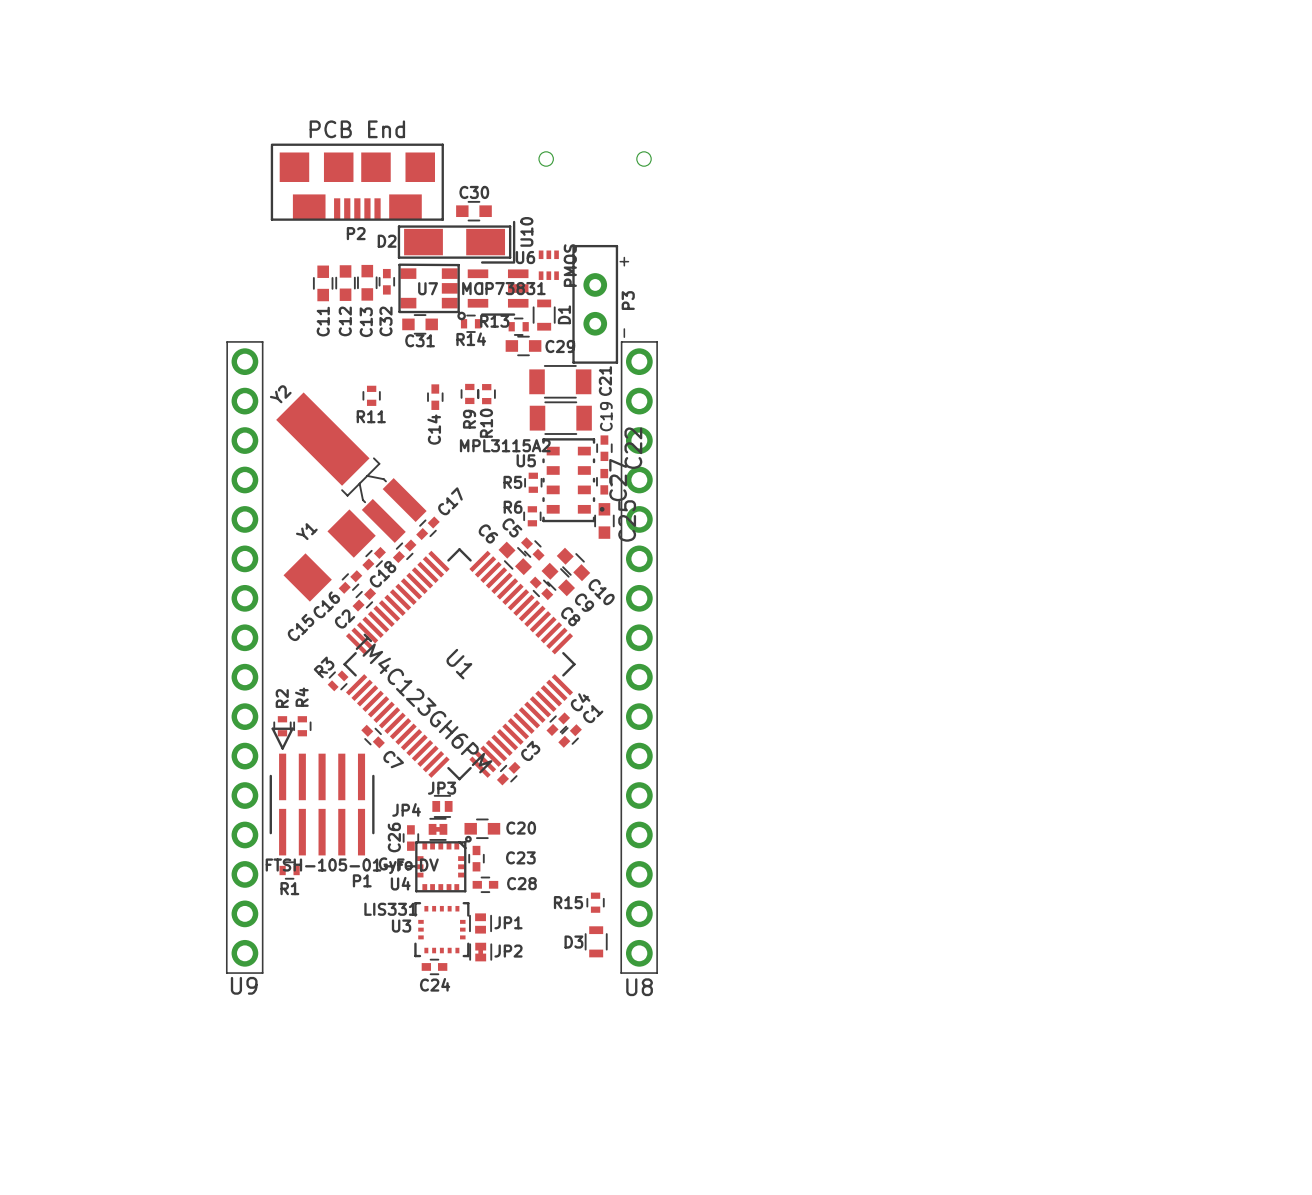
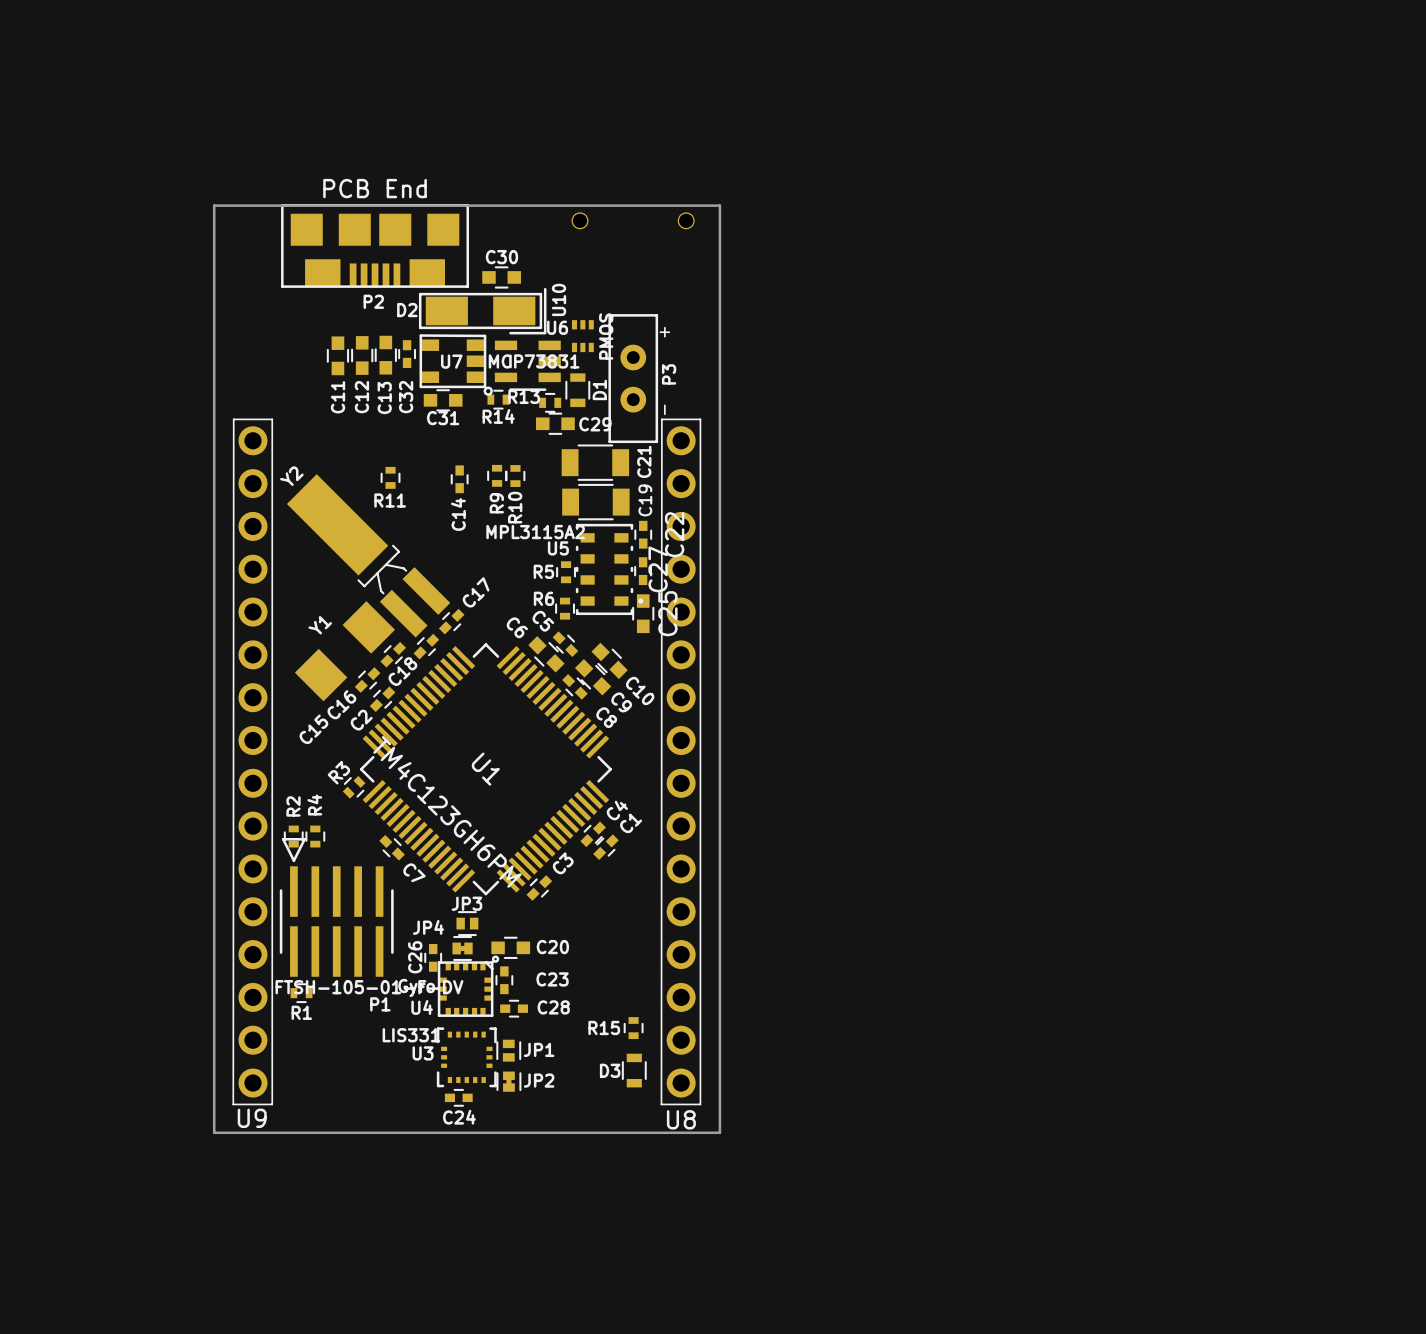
board edge: none -> (214, 205) (214, 1132) (719, 1132) (719, 205) (214, 205)

